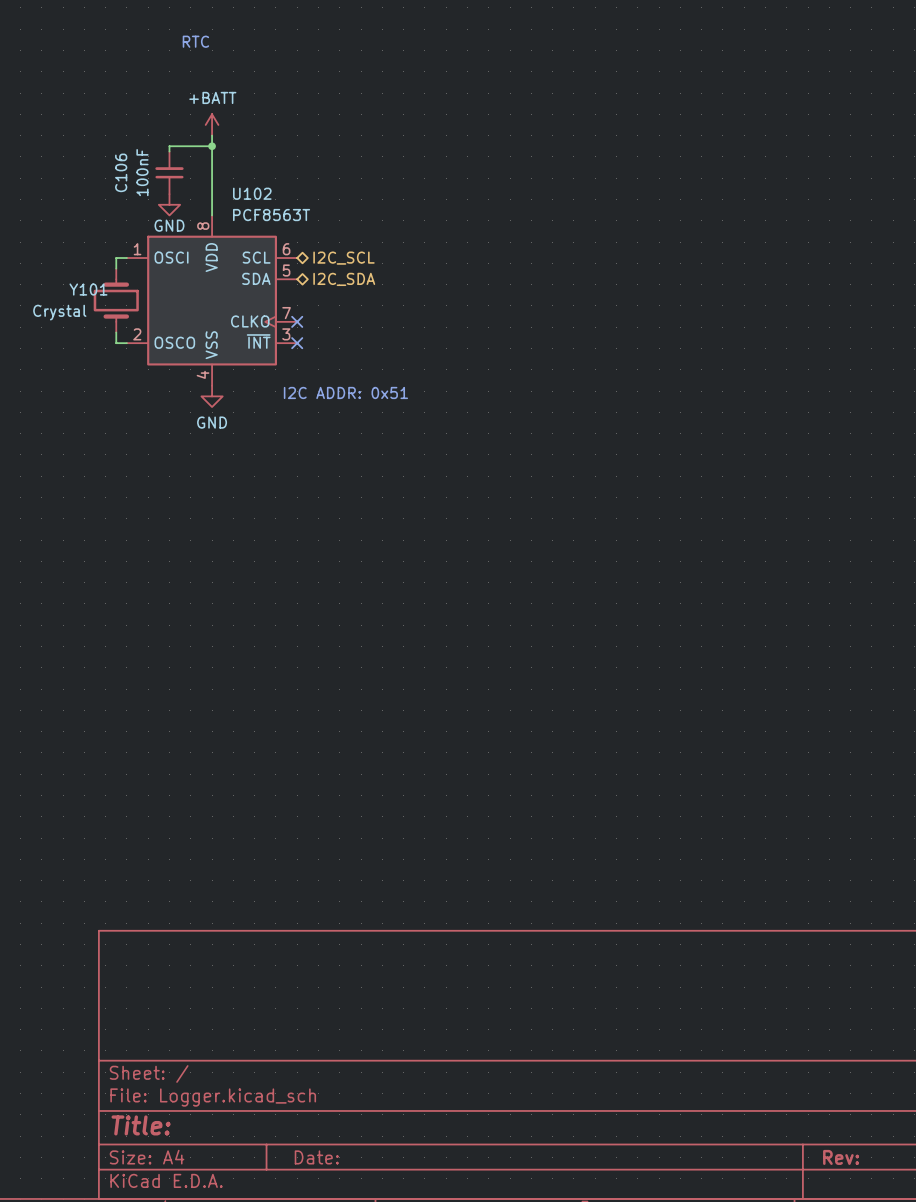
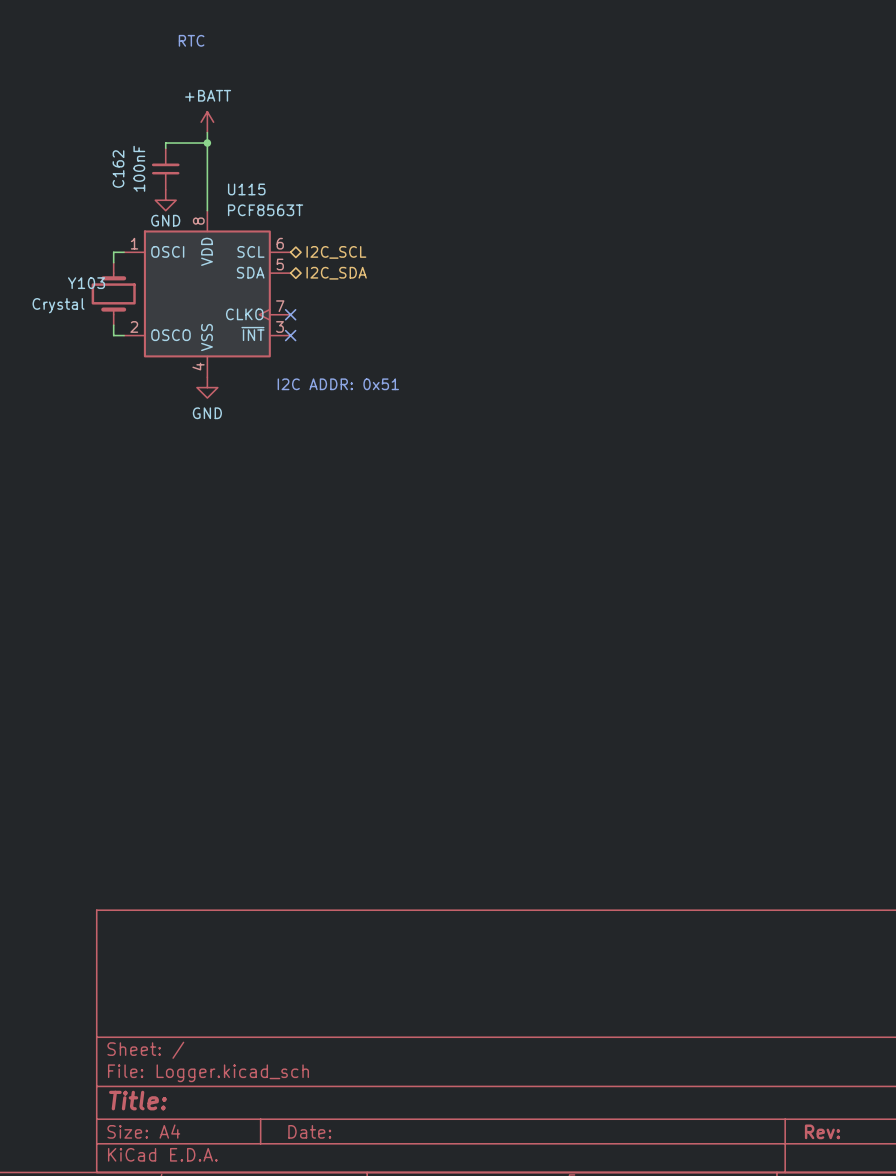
C106 name: C106 (121, 172) -> C162 (118, 169)
U102 name: U102 (252, 193) -> U115 (246, 189)
Y101 name: Y101 (88, 289) -> Y103 (86, 283)

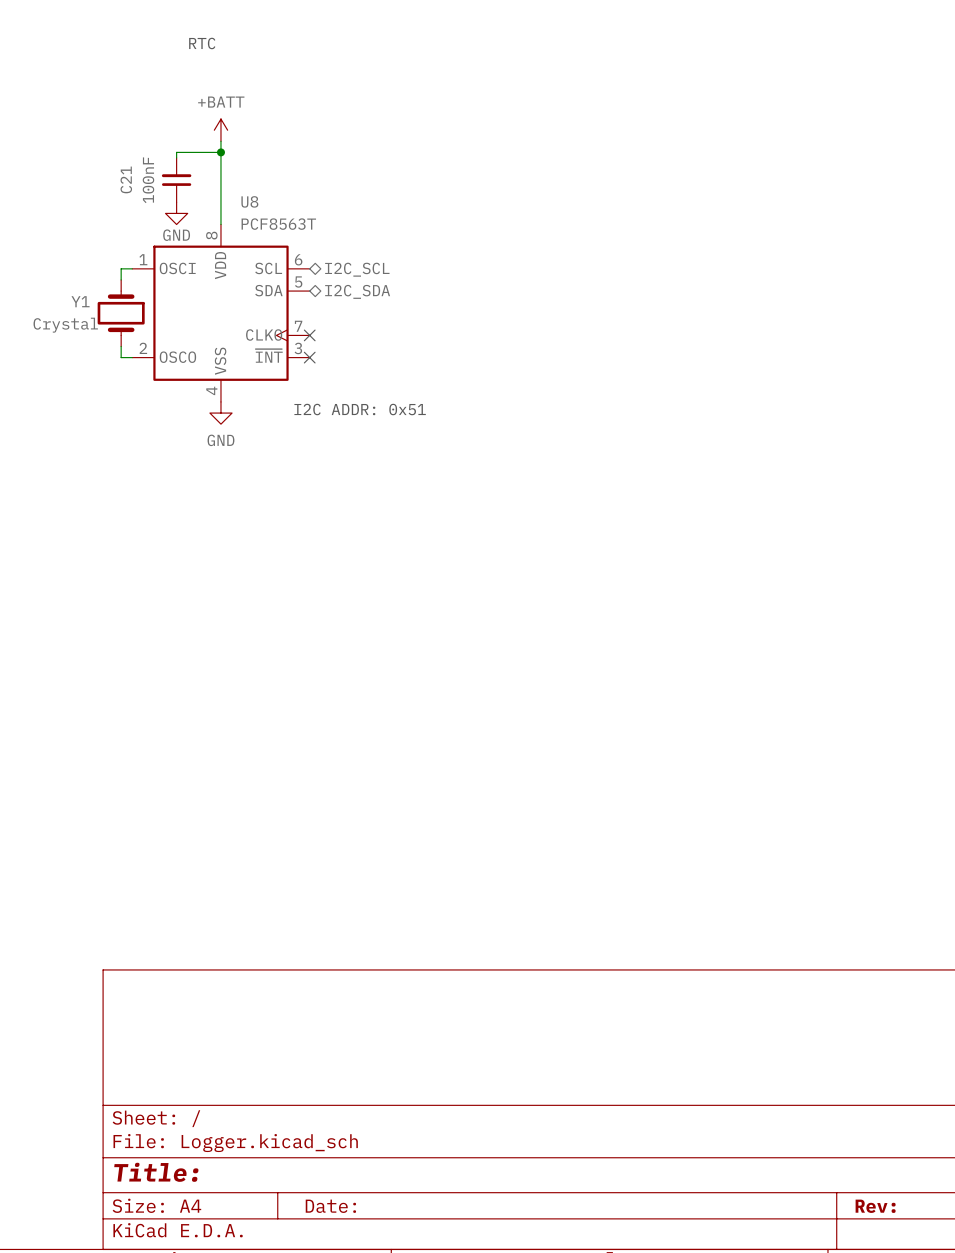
C162 name: C162 (118, 169) -> C21 (126, 179)
U115 name: U115 (246, 189) -> U8 (249, 201)
Y103 name: Y103 (86, 283) -> Y1 (80, 301)

